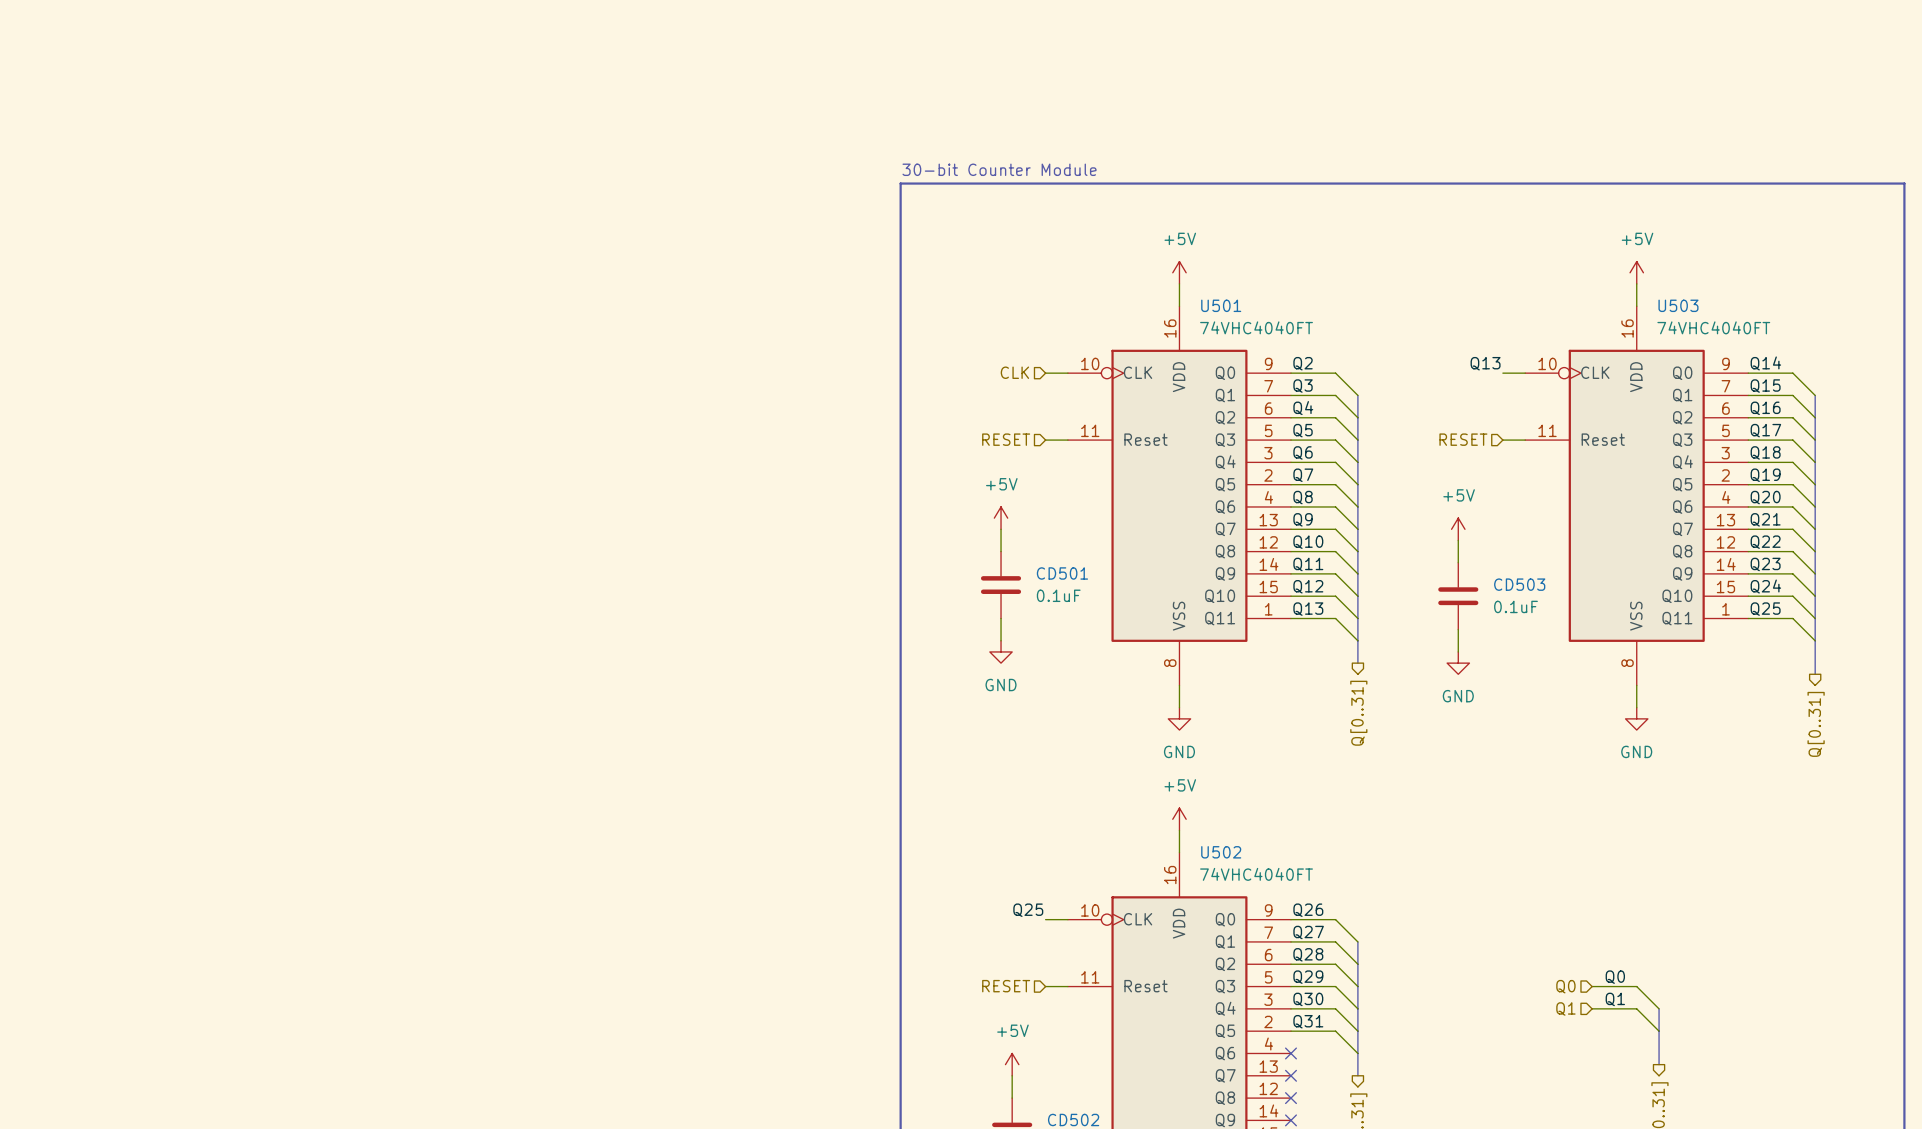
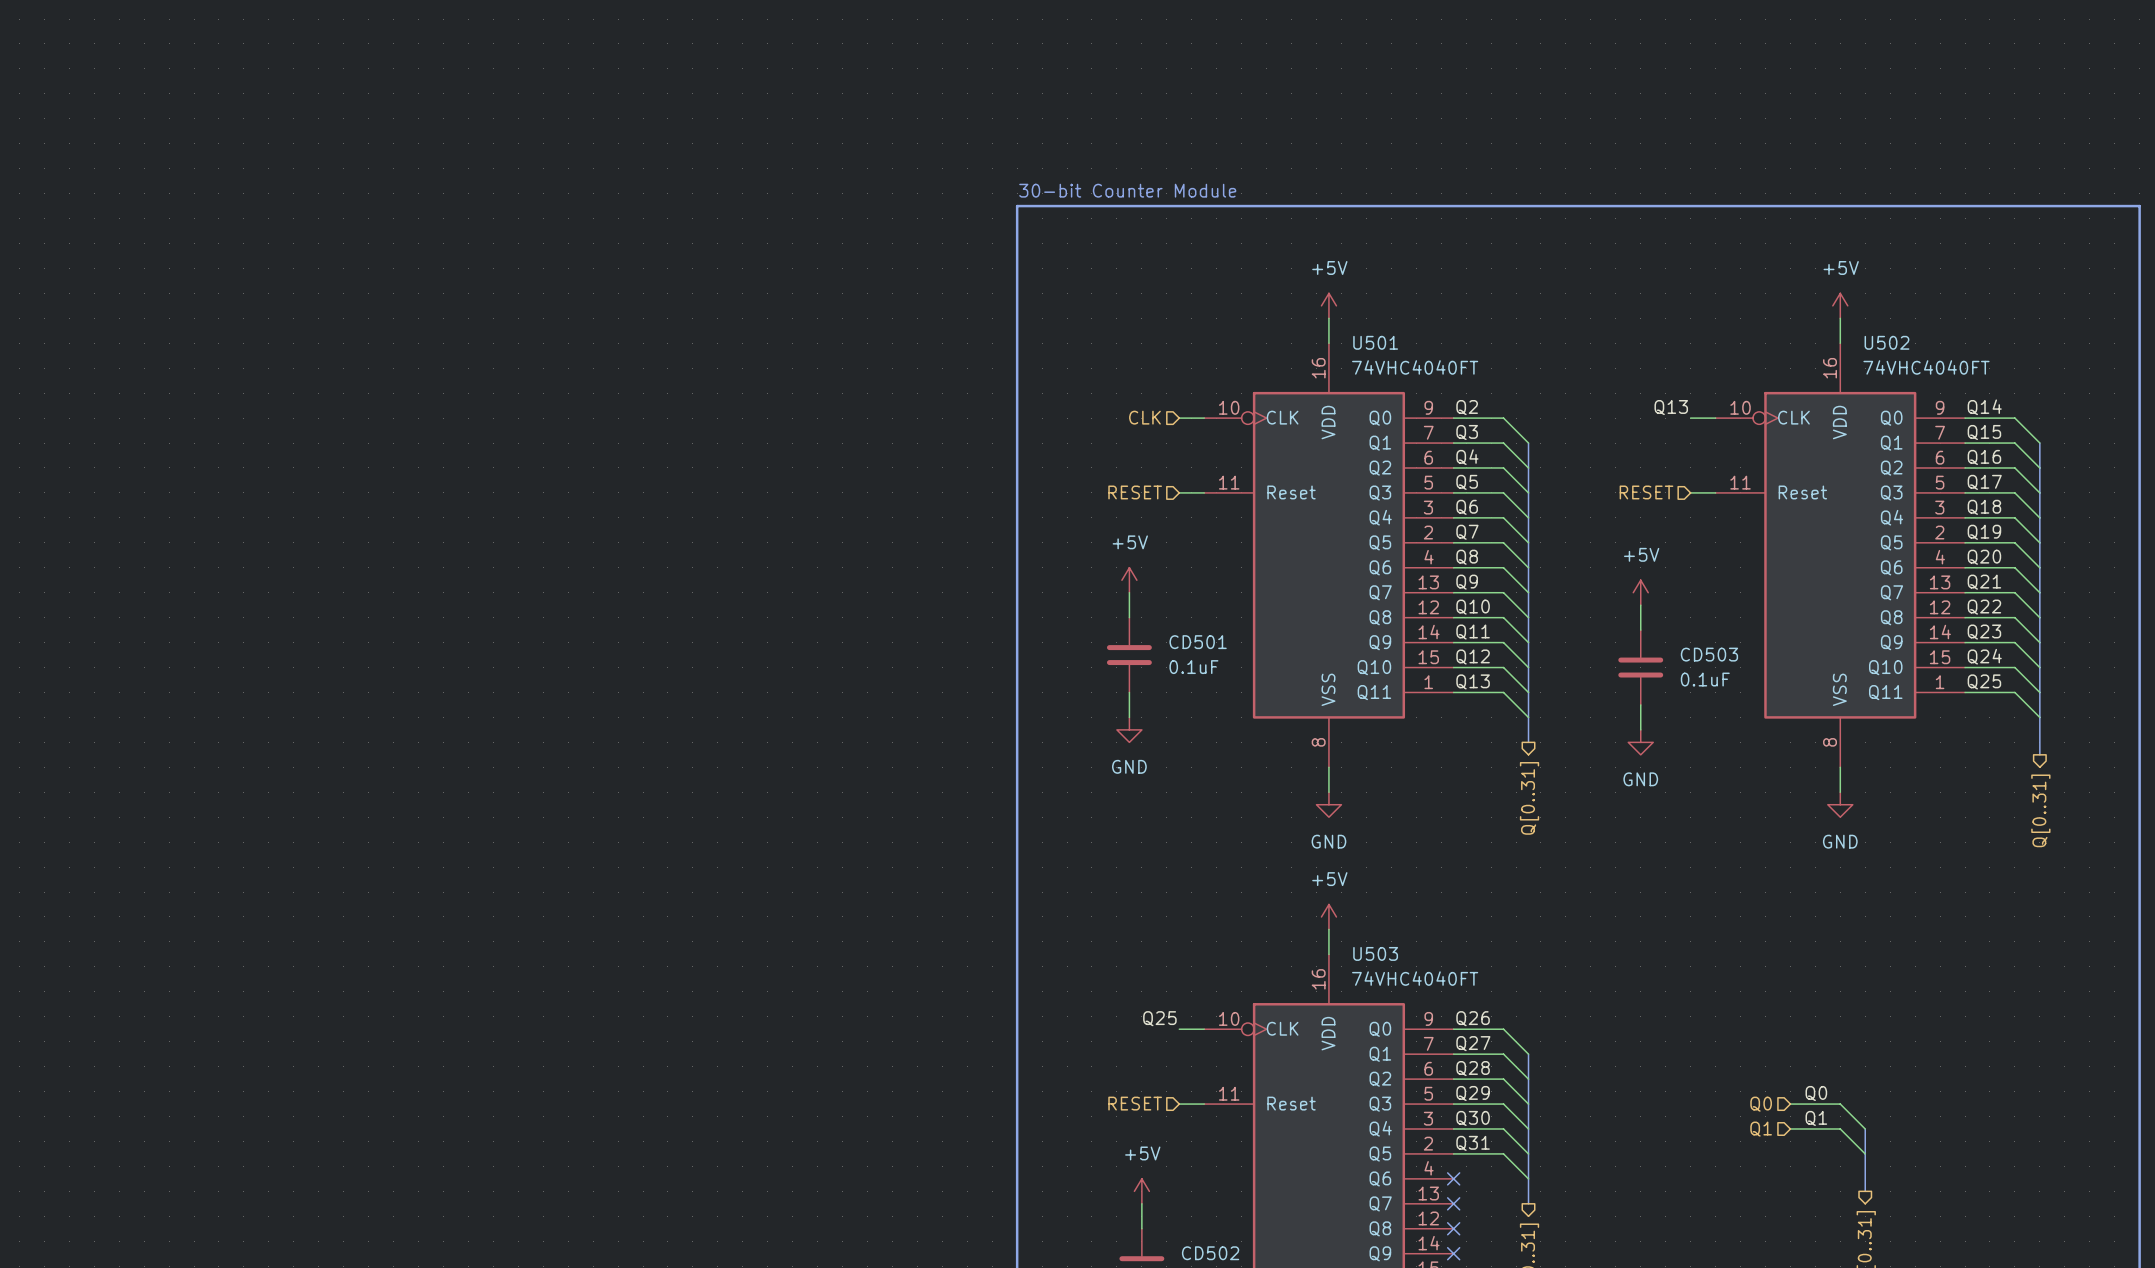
U503 name: U503 (1678, 305) -> U502 (1886, 342)
U502 name: U502 (1221, 852) -> U503 (1375, 953)

